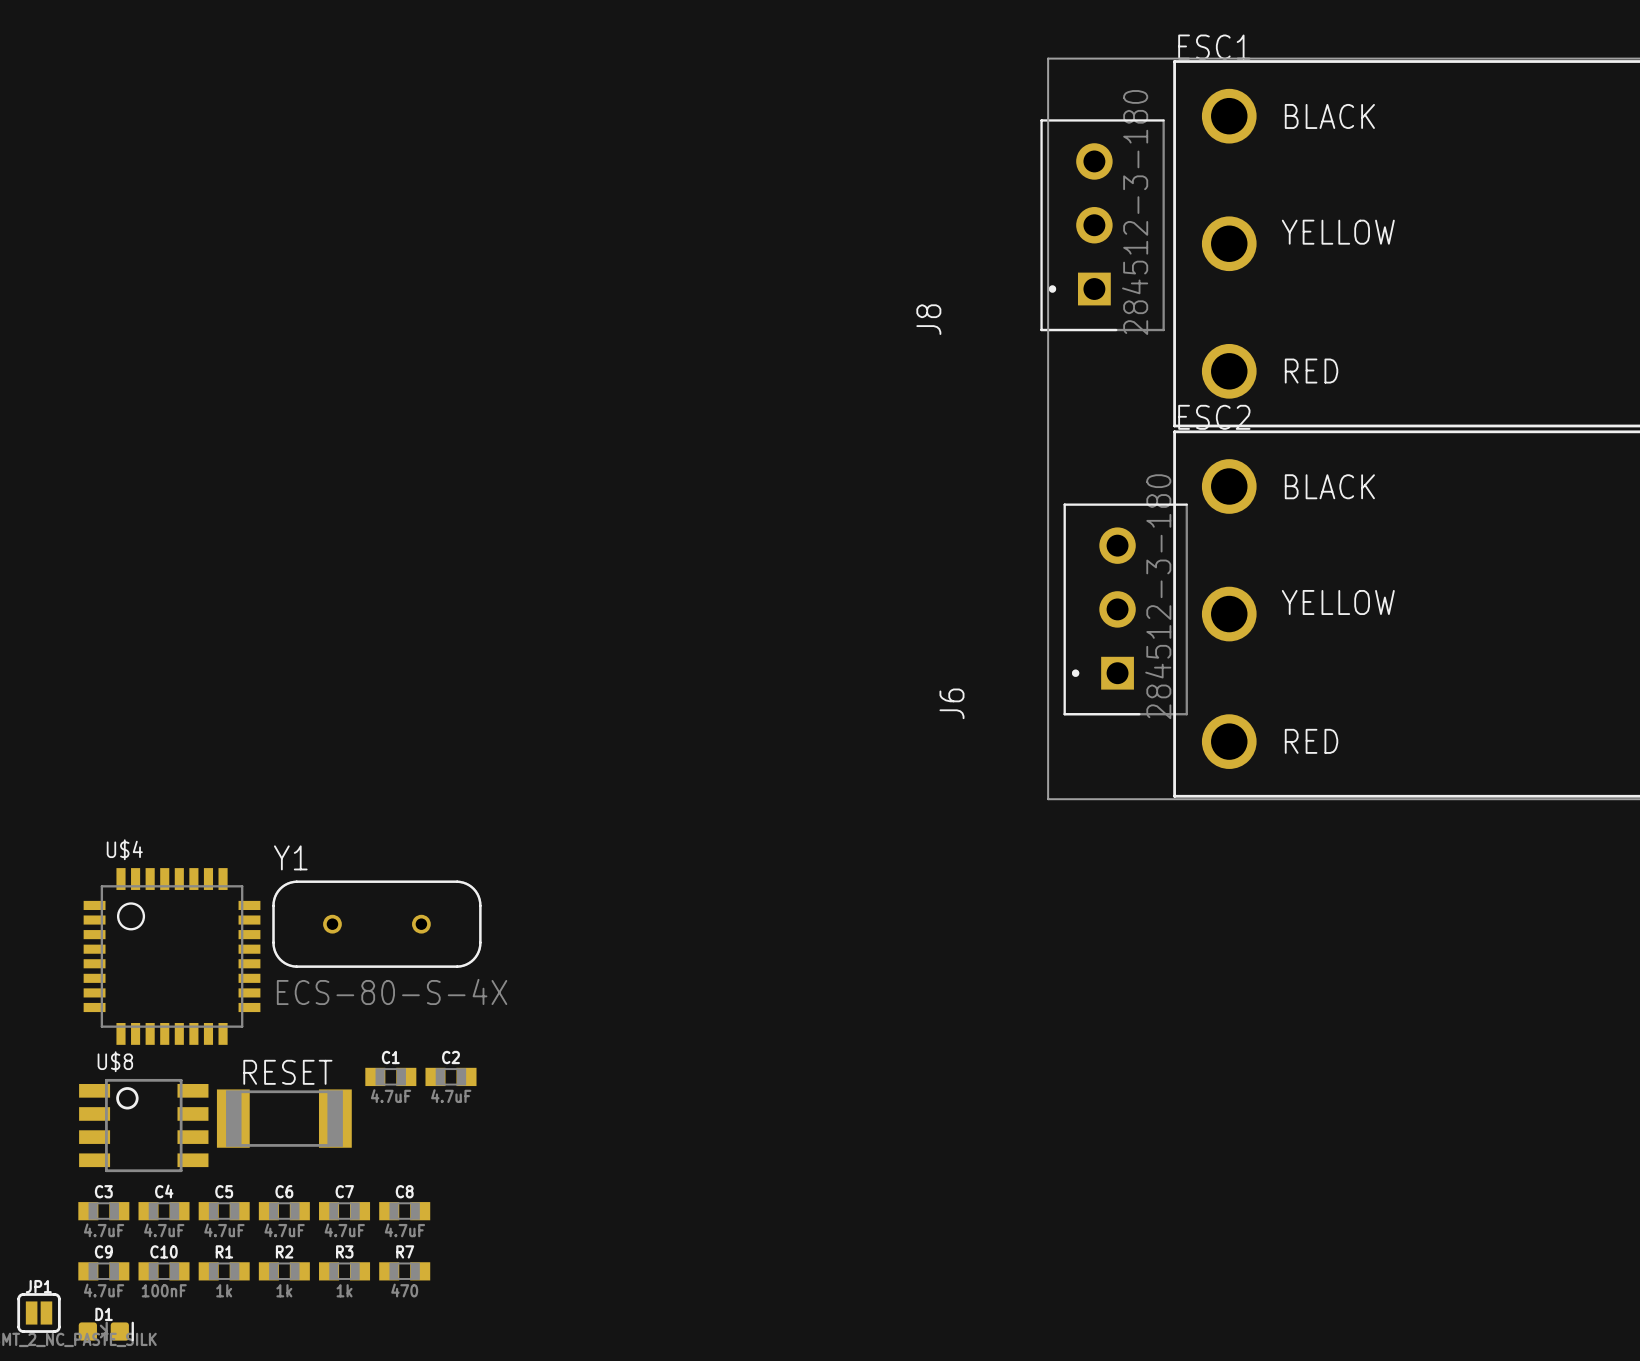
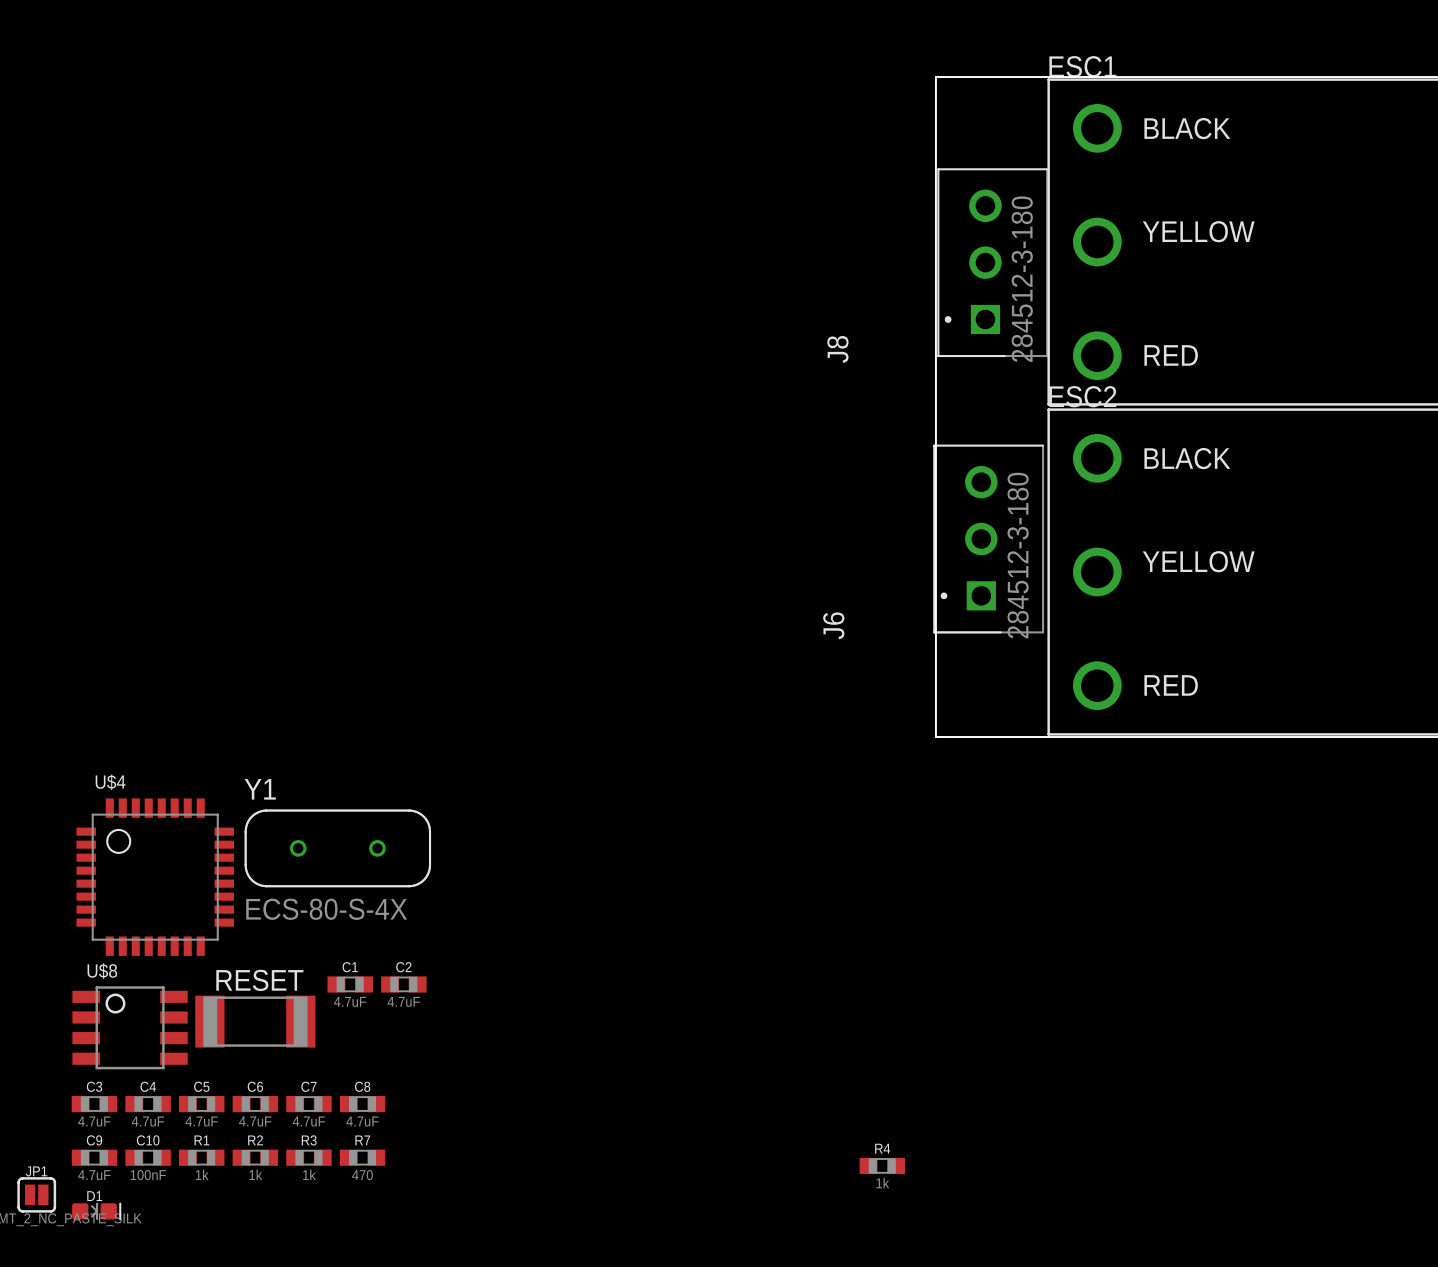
J8 position: (1102, 225) -> (992, 262)
J6 position: (1125, 609) -> (988, 539)
R4: none -> 1k (882, 1165)

